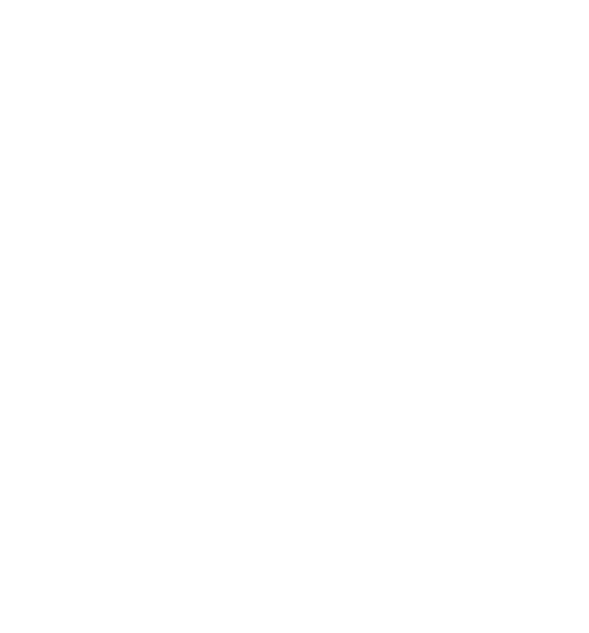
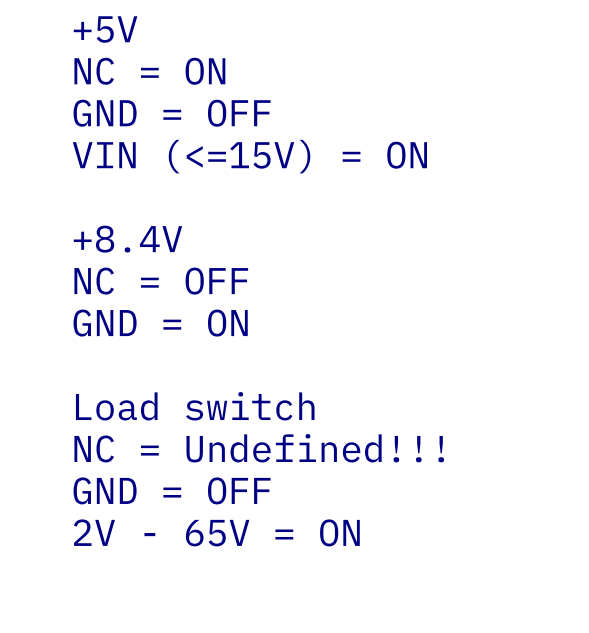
text: none -> +5V (105, 29)
text: none -> NC = ON (149, 71)
text: none -> GND = OFF (172, 113)
text: none -> VIN (<=15V) = ON (249, 156)
text: none -> +8.4V (127, 239)
text: none -> NC = OFF (161, 281)
text: none -> GND = ON (160, 323)
text: none -> Load switch (195, 406)
text: none -> NC = Undefined!!! (259, 448)
text: none -> GND = OFF (172, 490)
text: none -> 2V - 65V = ON (216, 532)

